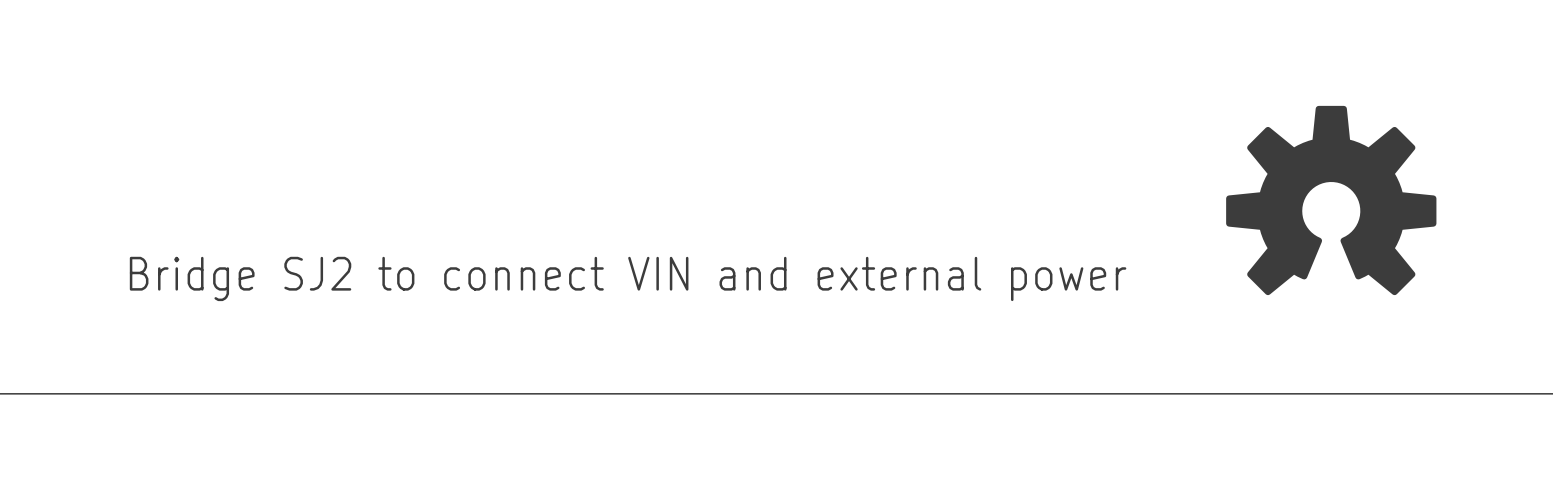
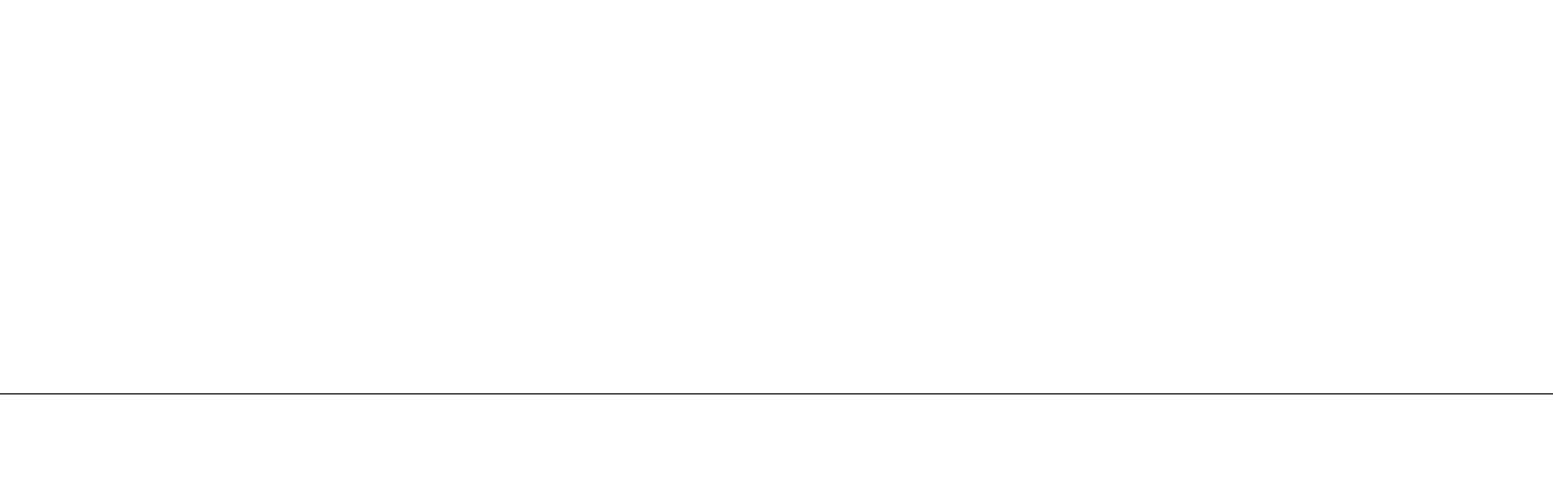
drawing: [1226, 105, 1437, 296] -> none
text: Bridge SJ2 to connect VIN and external power (628, 278) -> none

